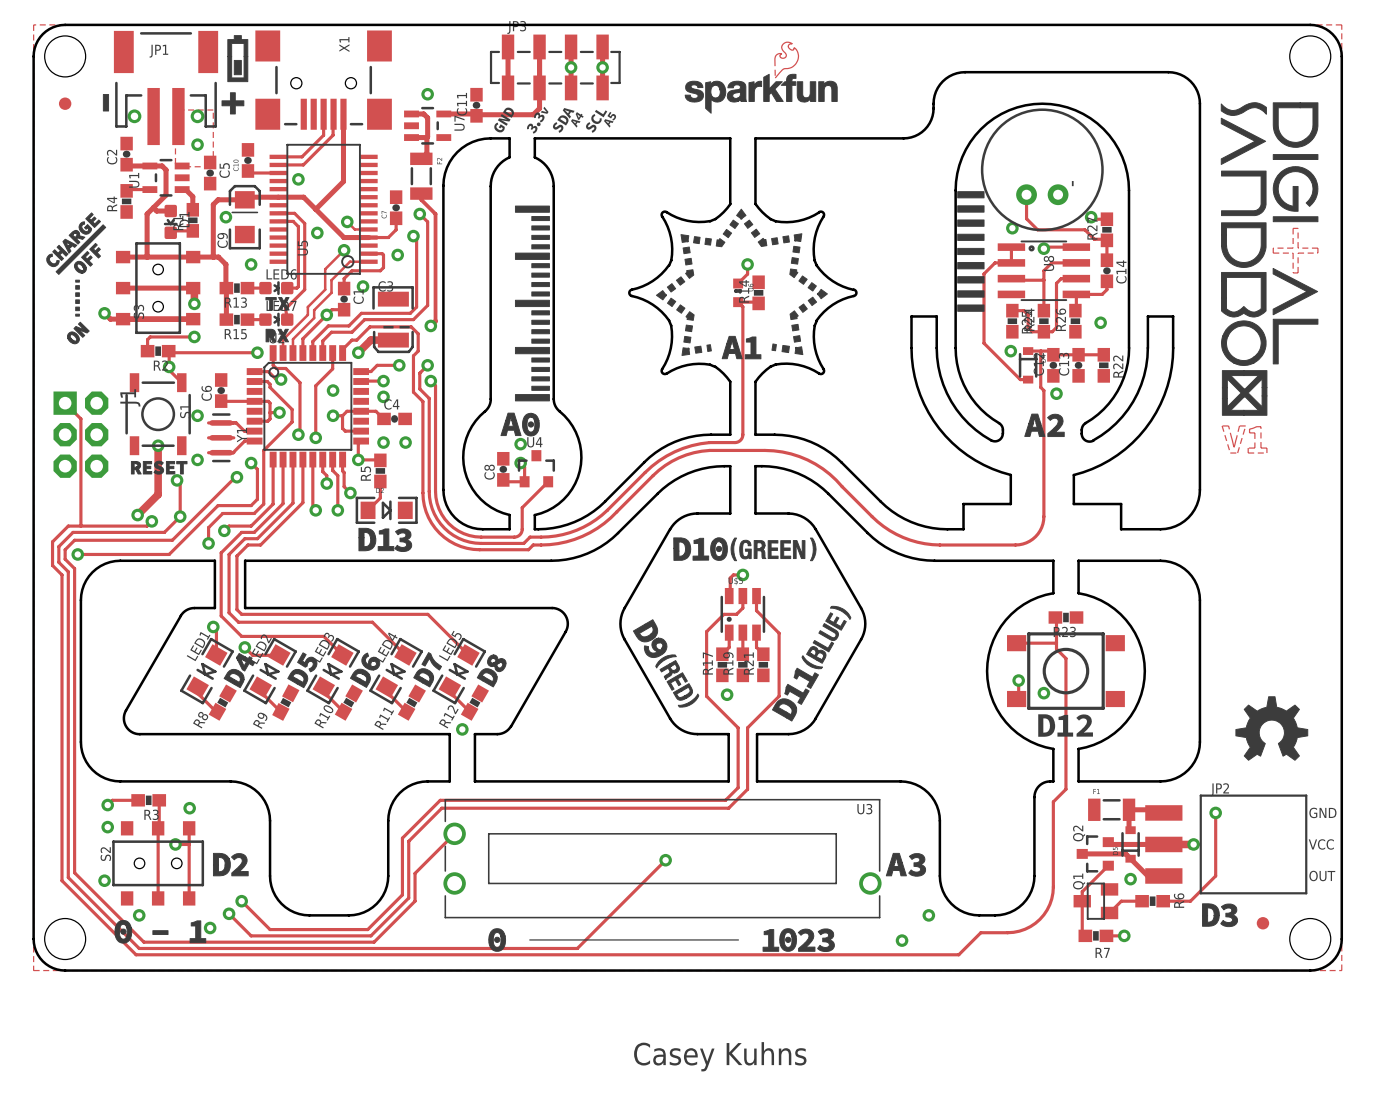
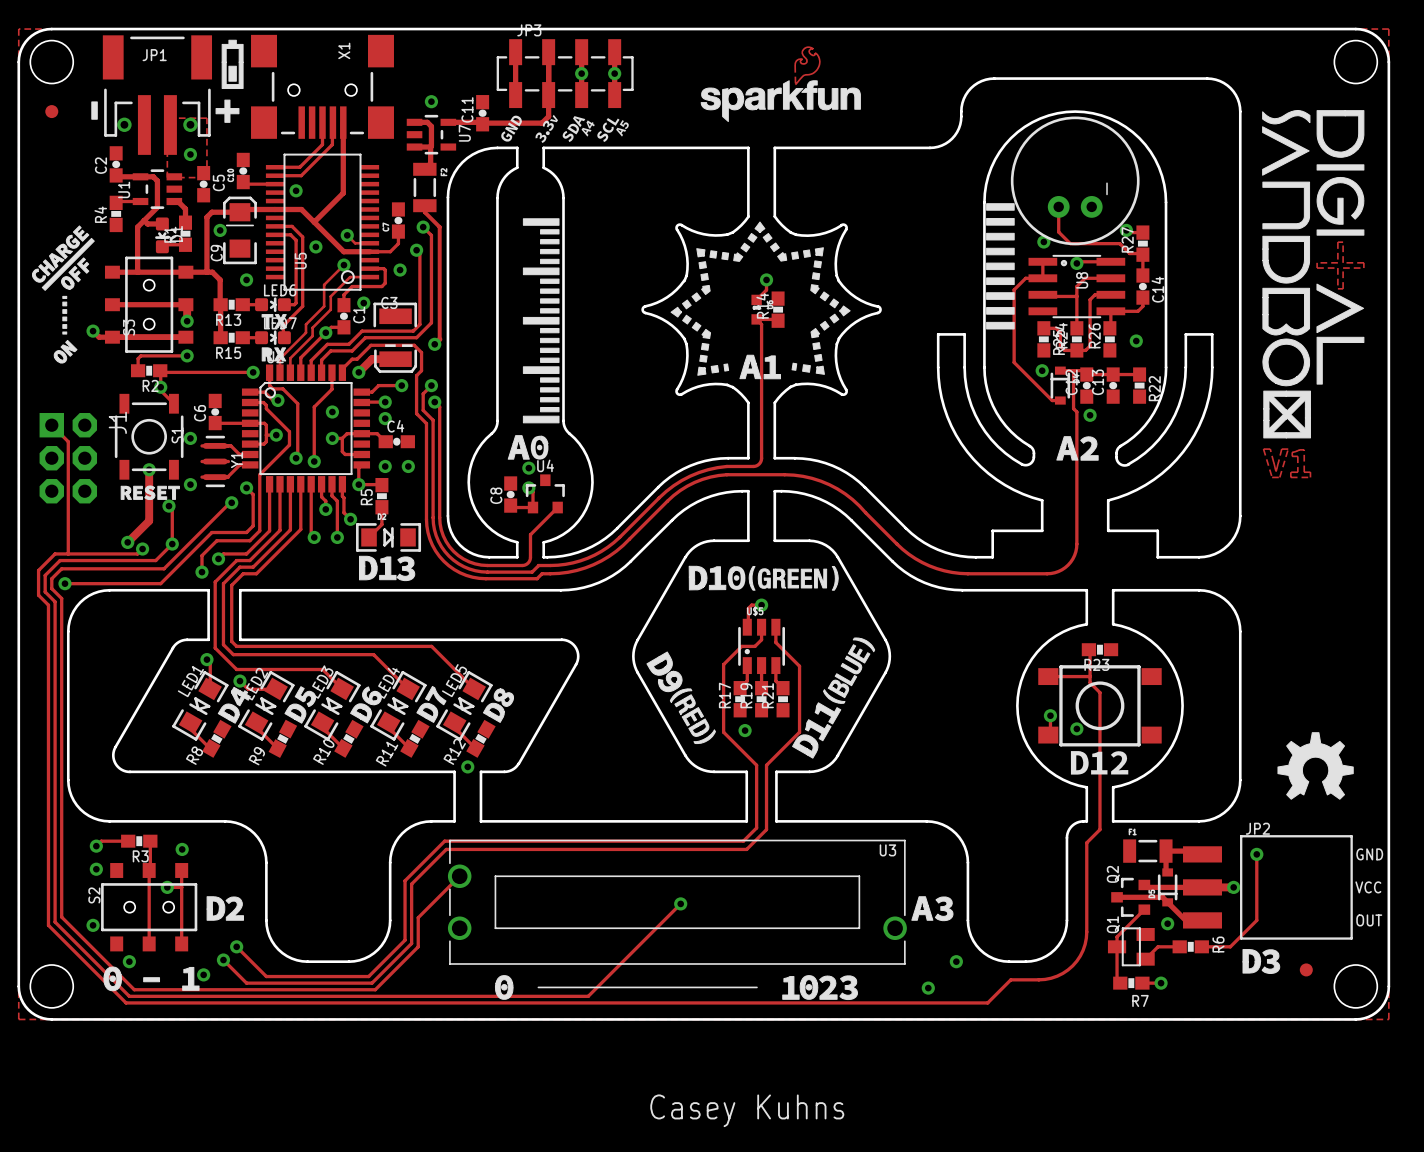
drawing: [522, 412, 540, 437] -> none
drawing: none -> [530, 435, 549, 460]
drawing: [710, 537, 728, 561] -> none
drawing: none -> [727, 566, 746, 590]

